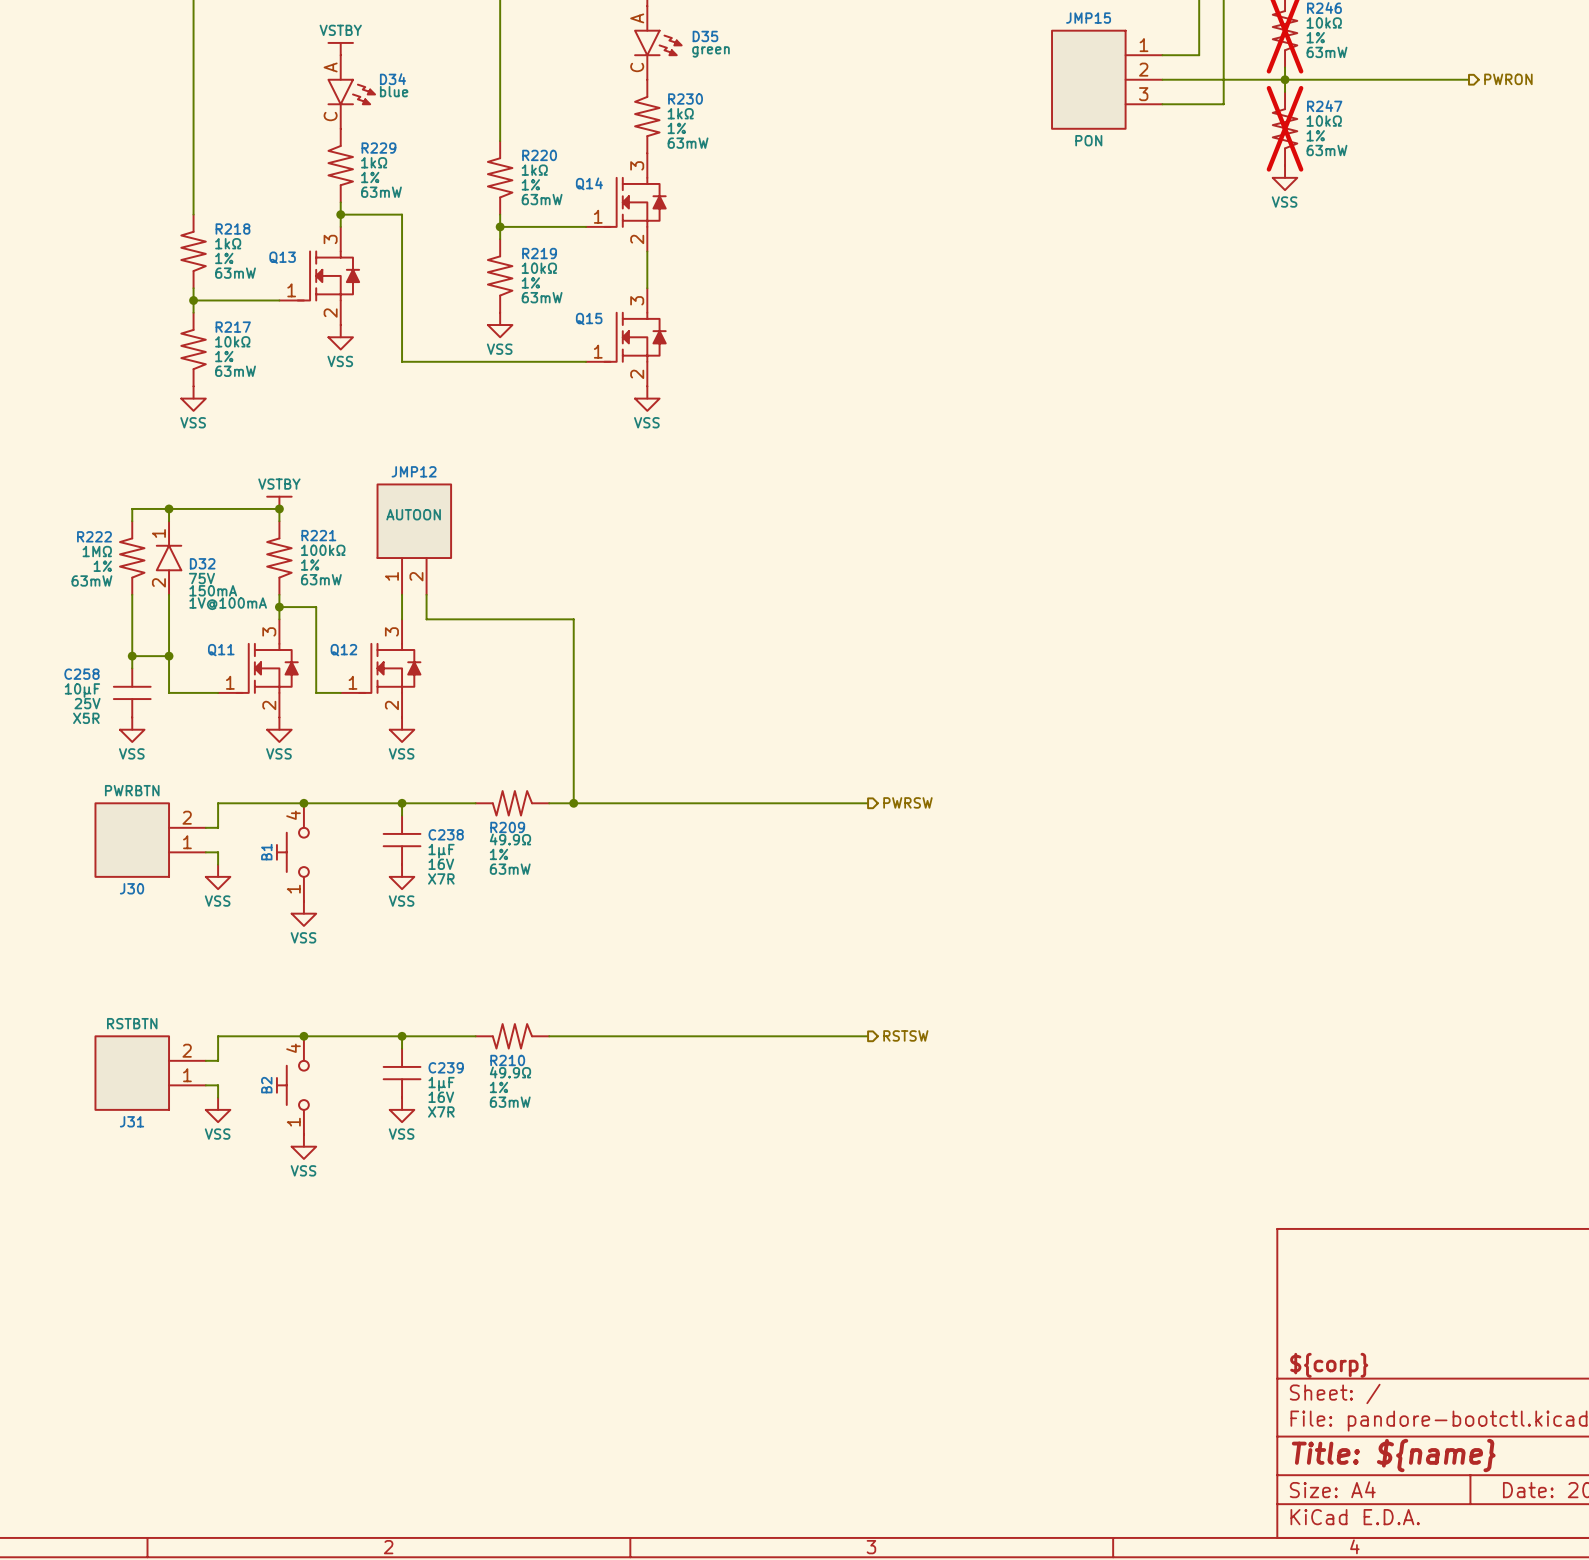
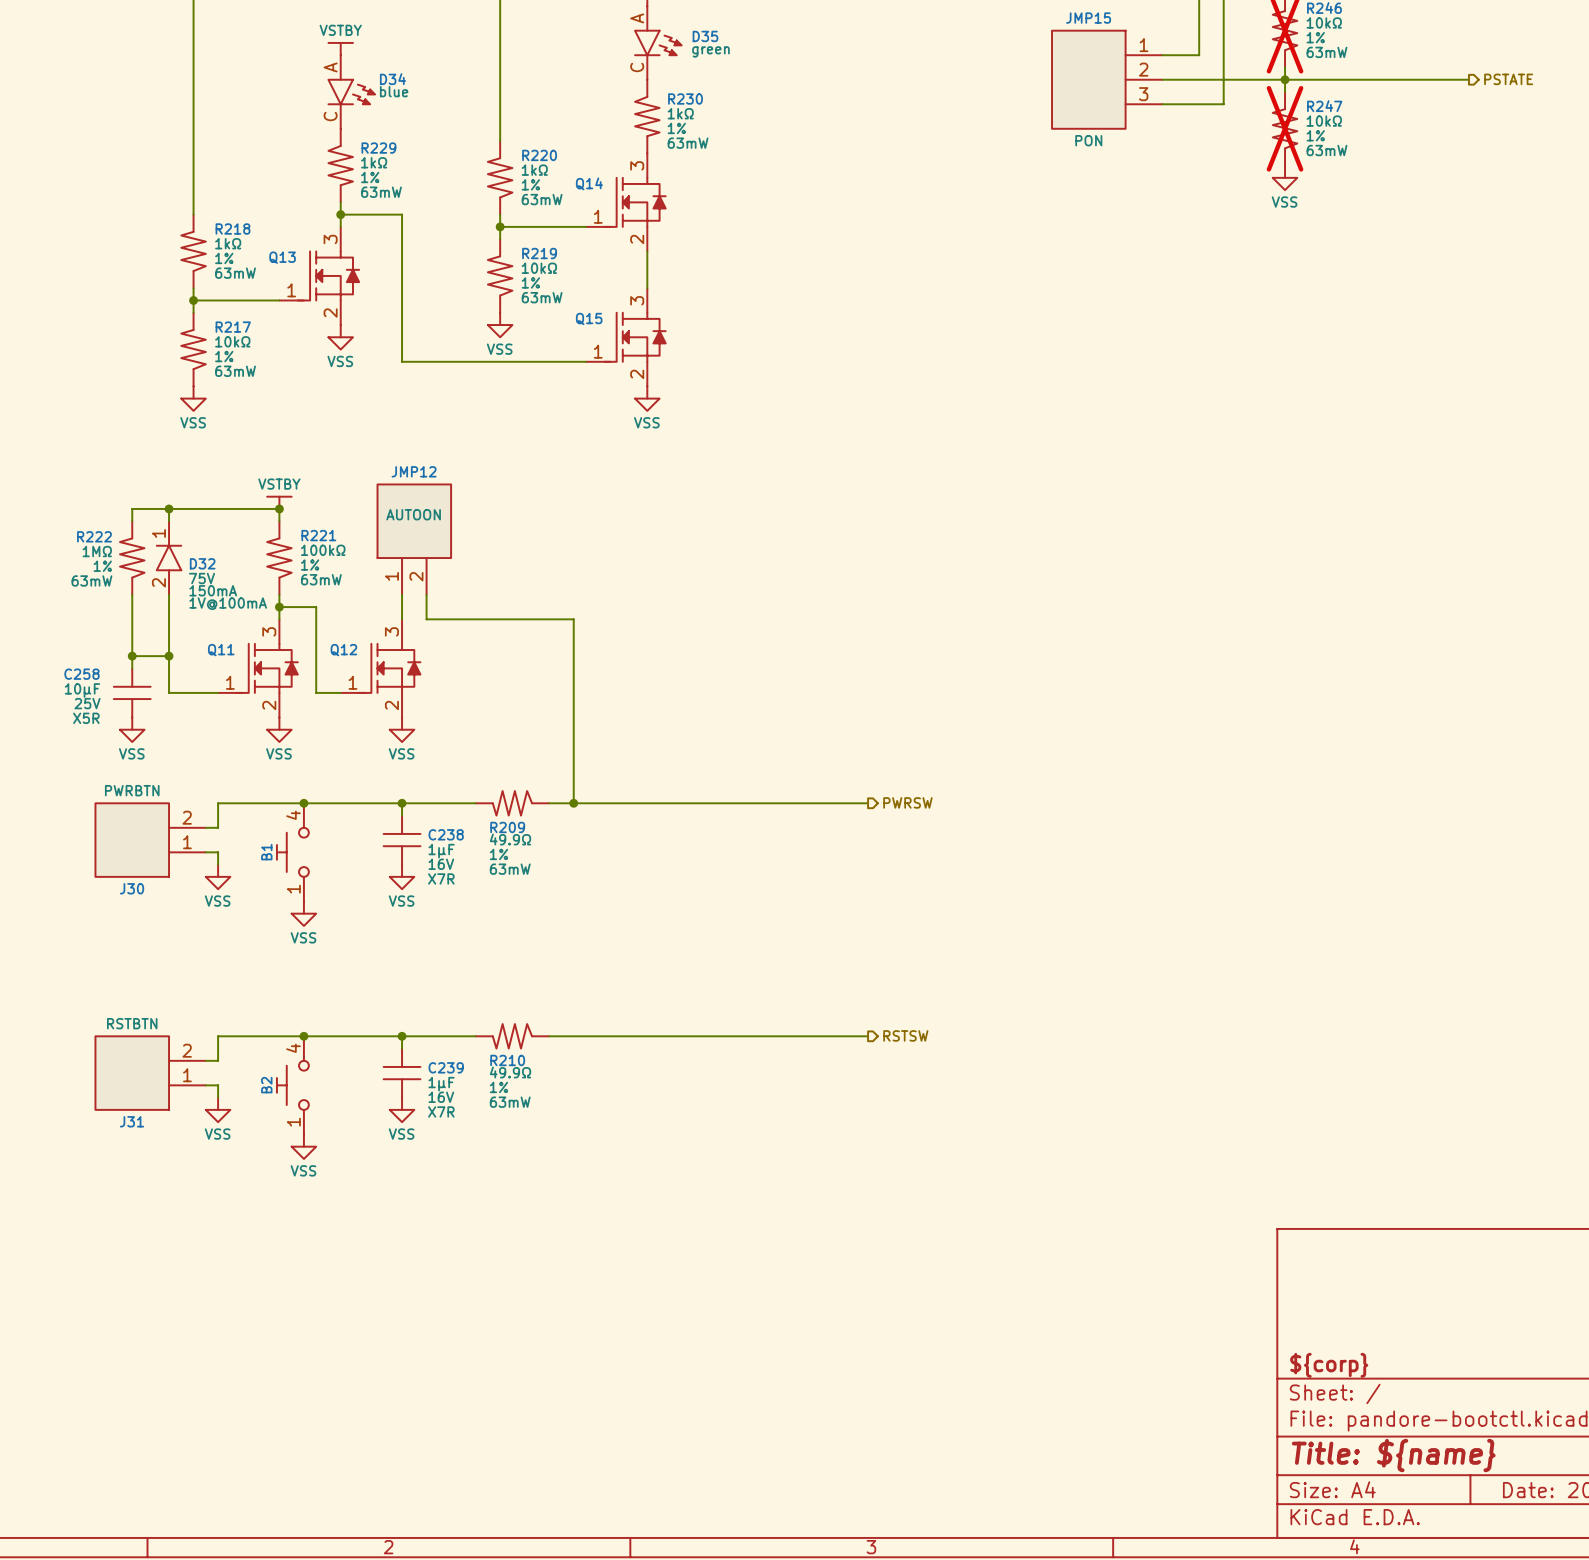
hierarchical label: PWRON (1508, 79) -> PSTATE (1508, 79)

